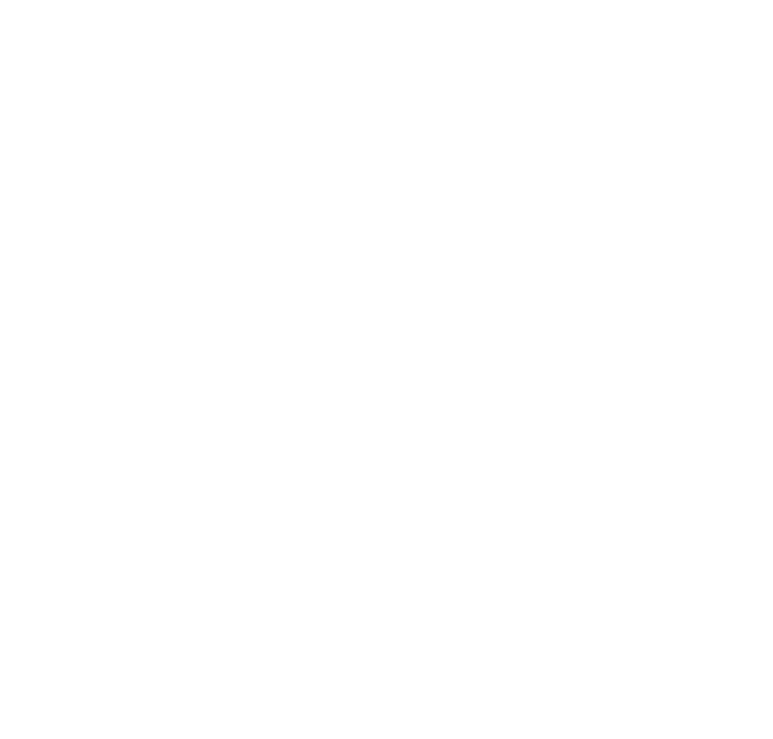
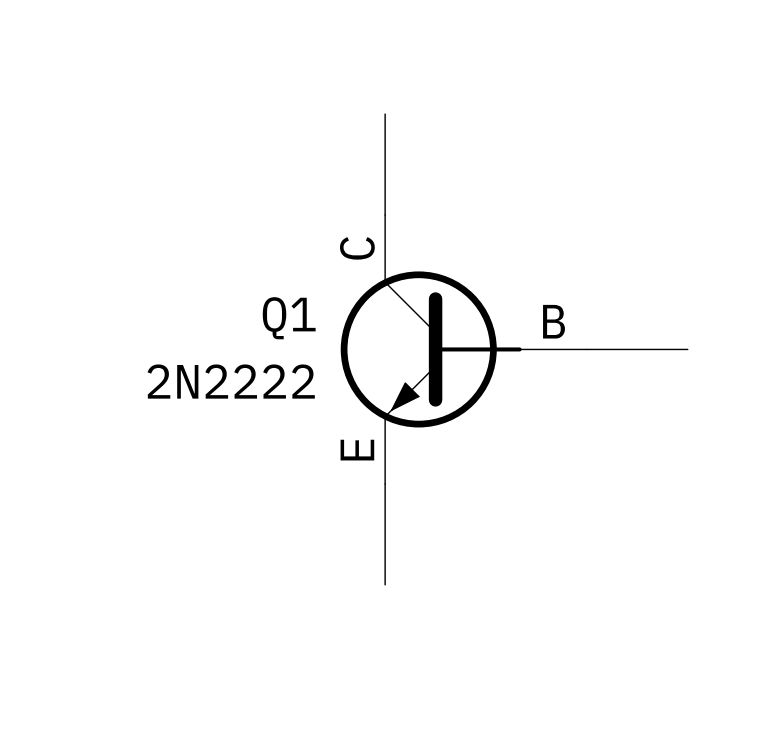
wire: none -> (385, 114) (385, 214)
Q1: none -> 2N2222 (463, 349)
wire: none -> (586, 349) (687, 349)
wire: none -> (385, 483) (385, 584)

